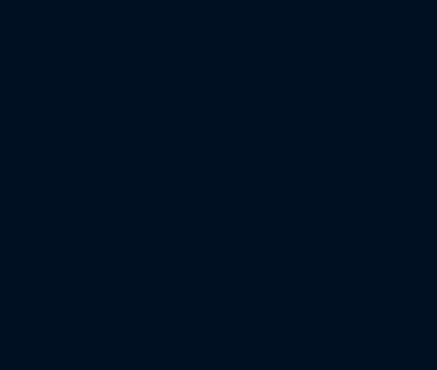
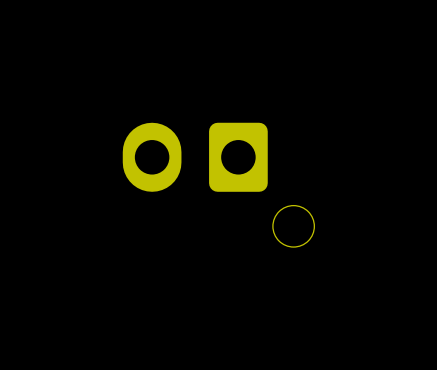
part: none -> (218, 184)

